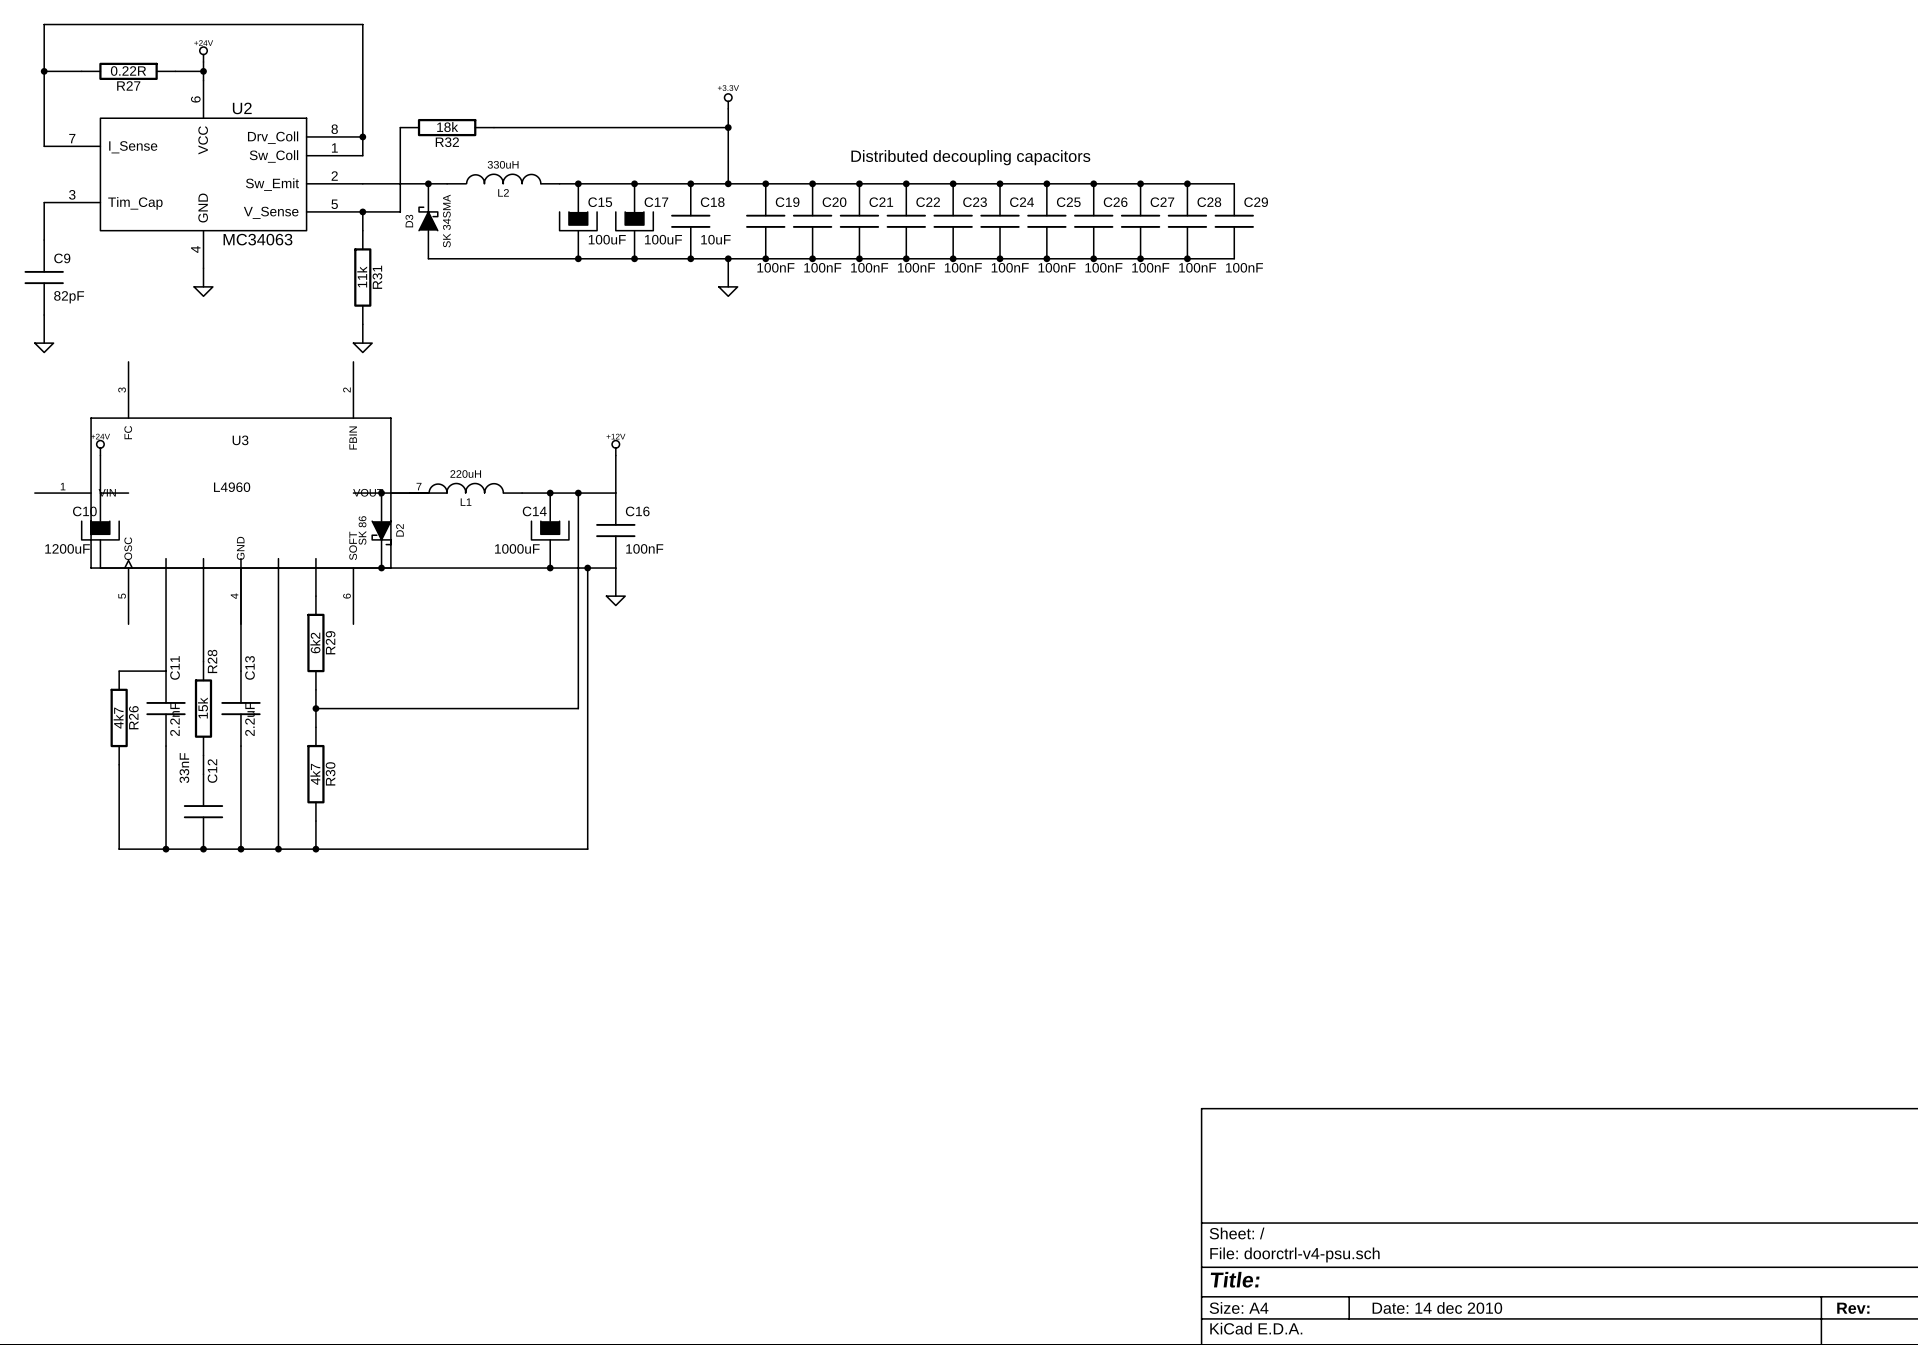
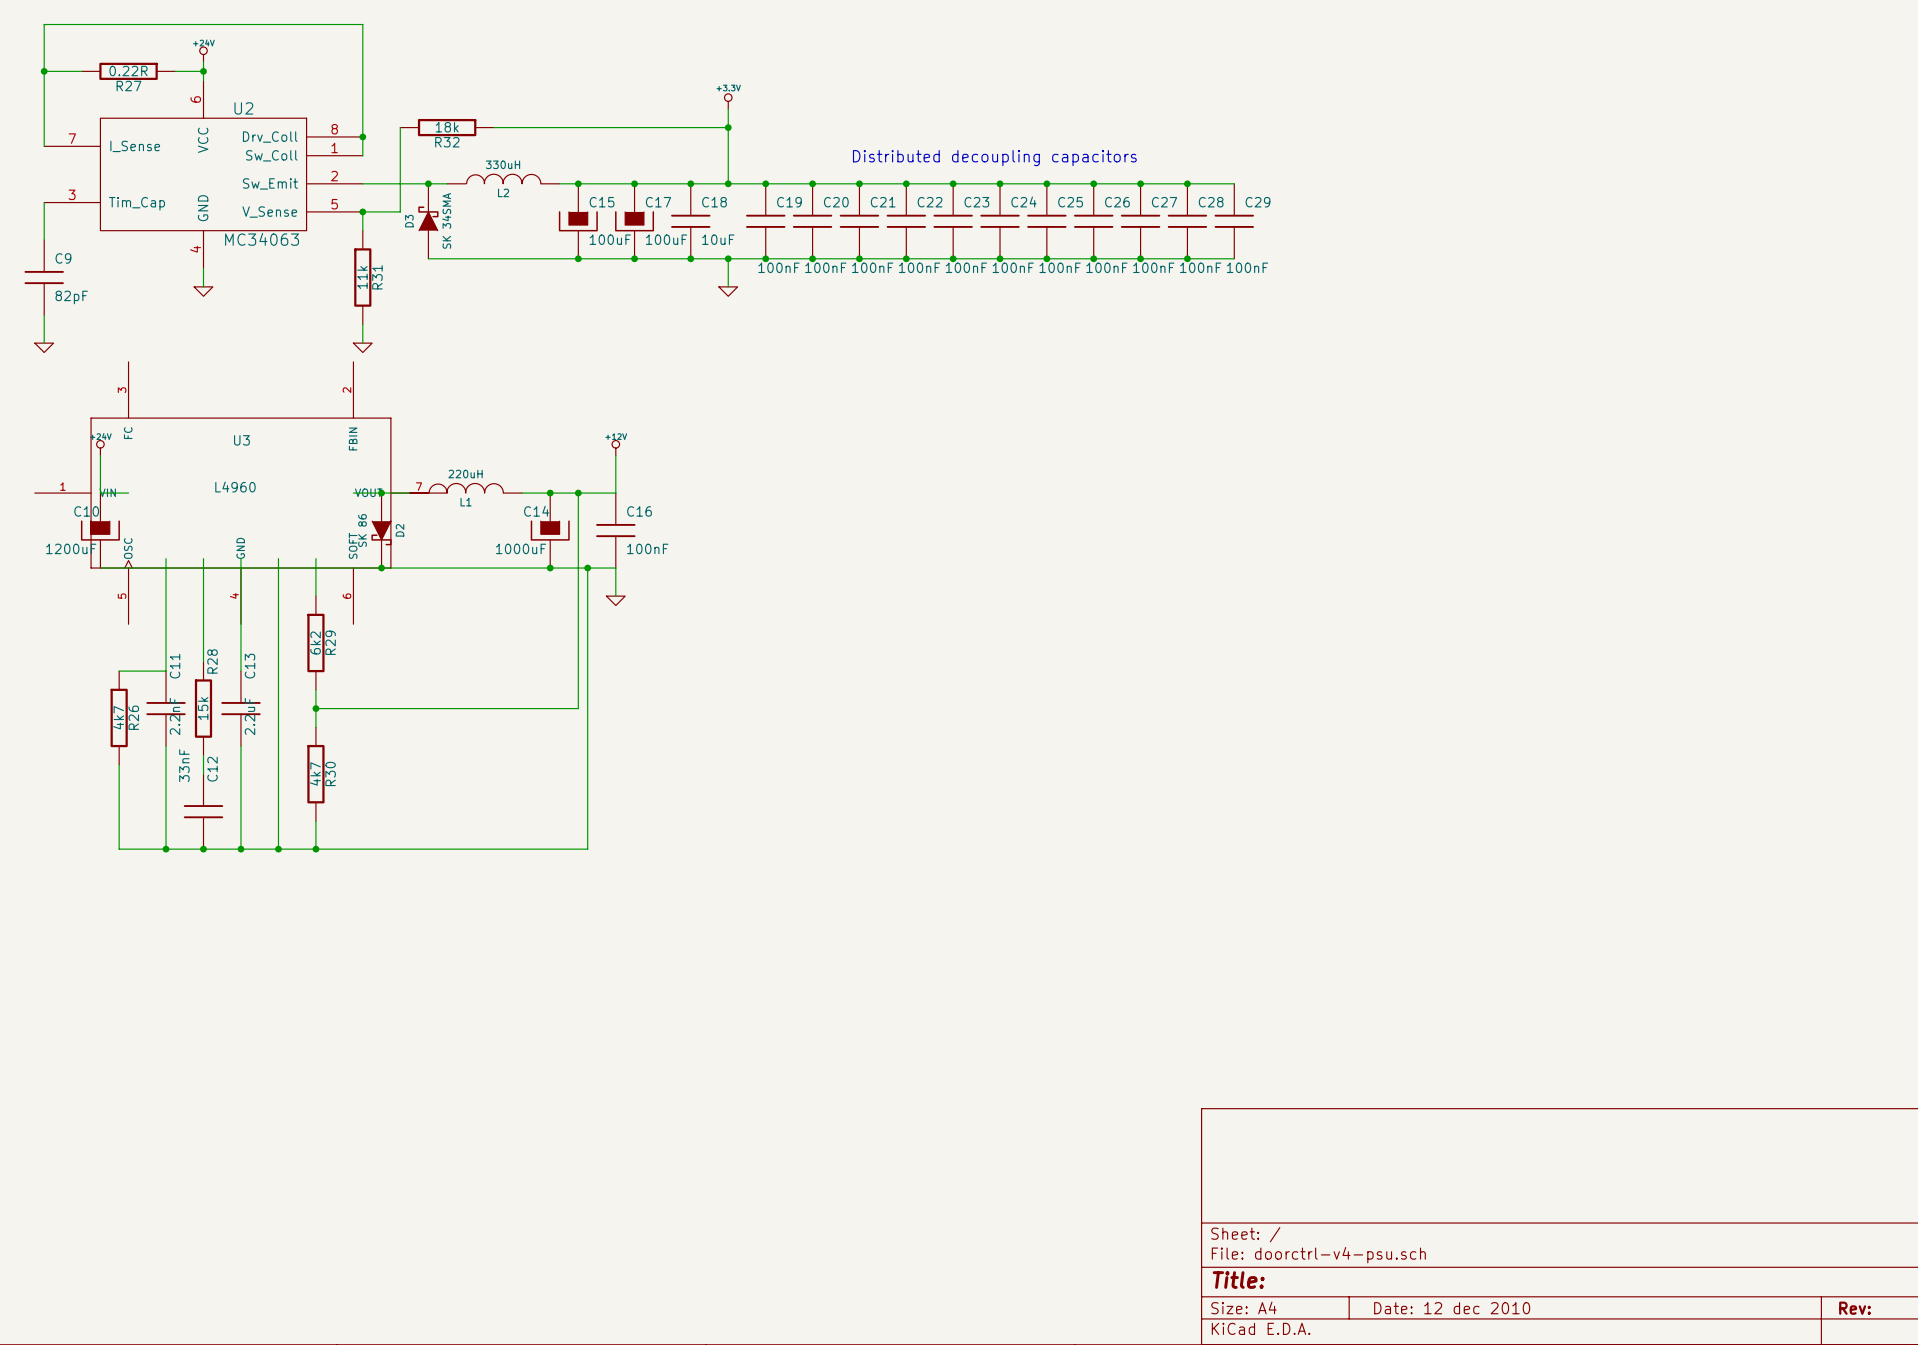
title block: Date: 14 dec 2010 (1437, 1307) -> Date: 12 dec 2010 (1452, 1308)

